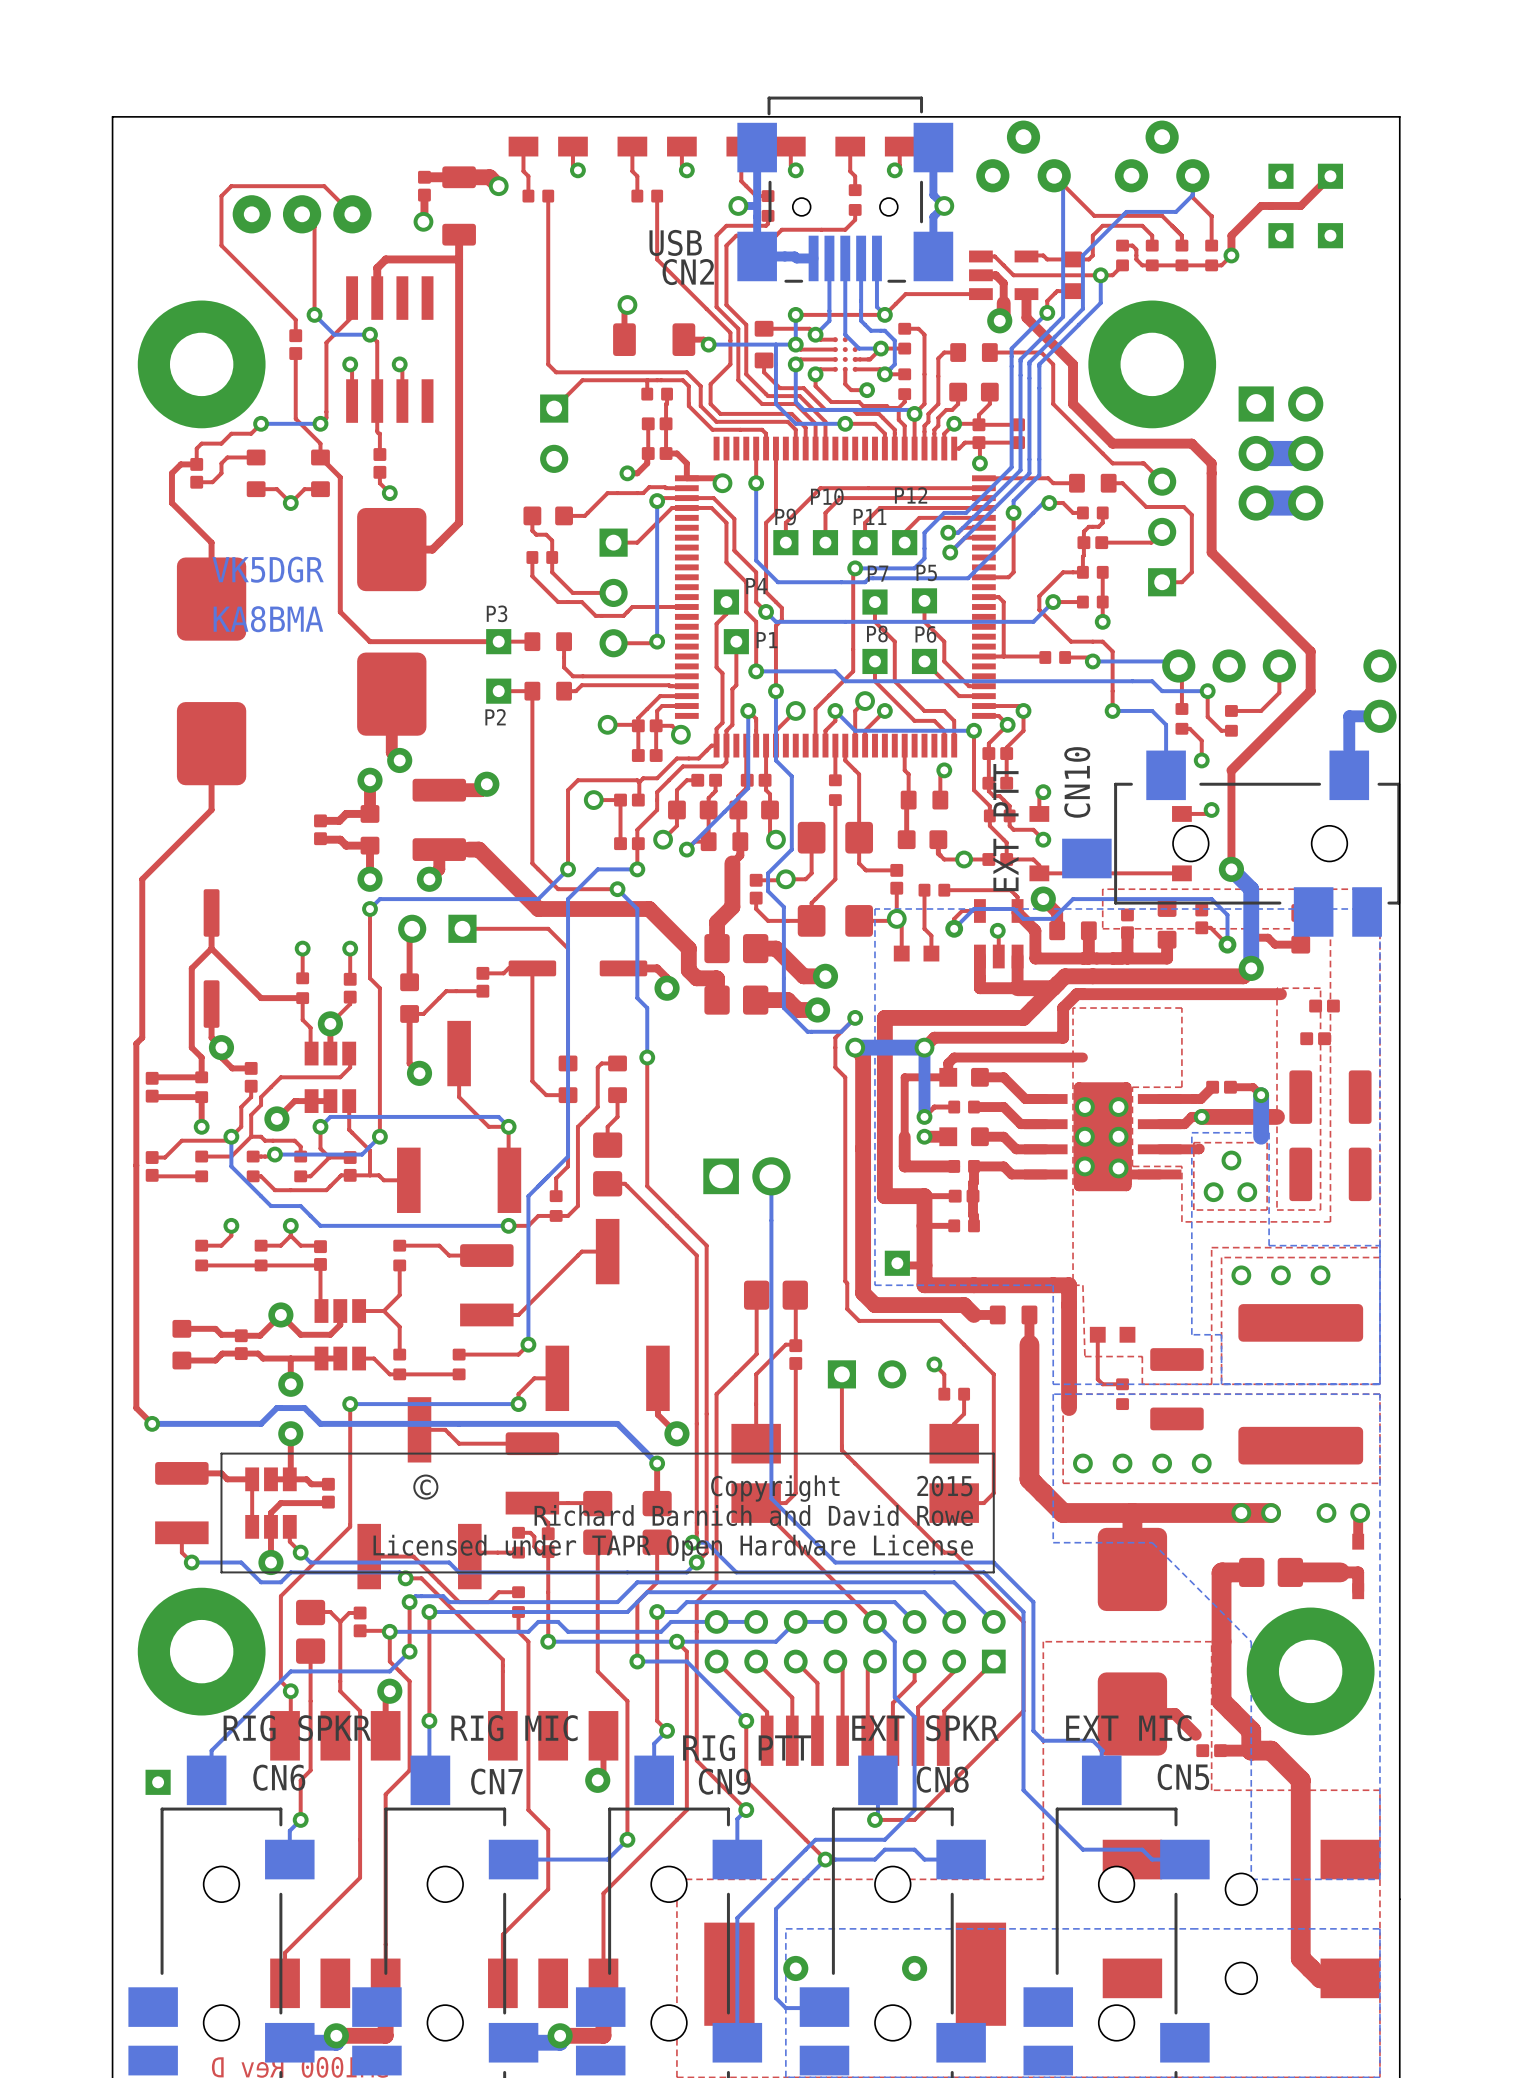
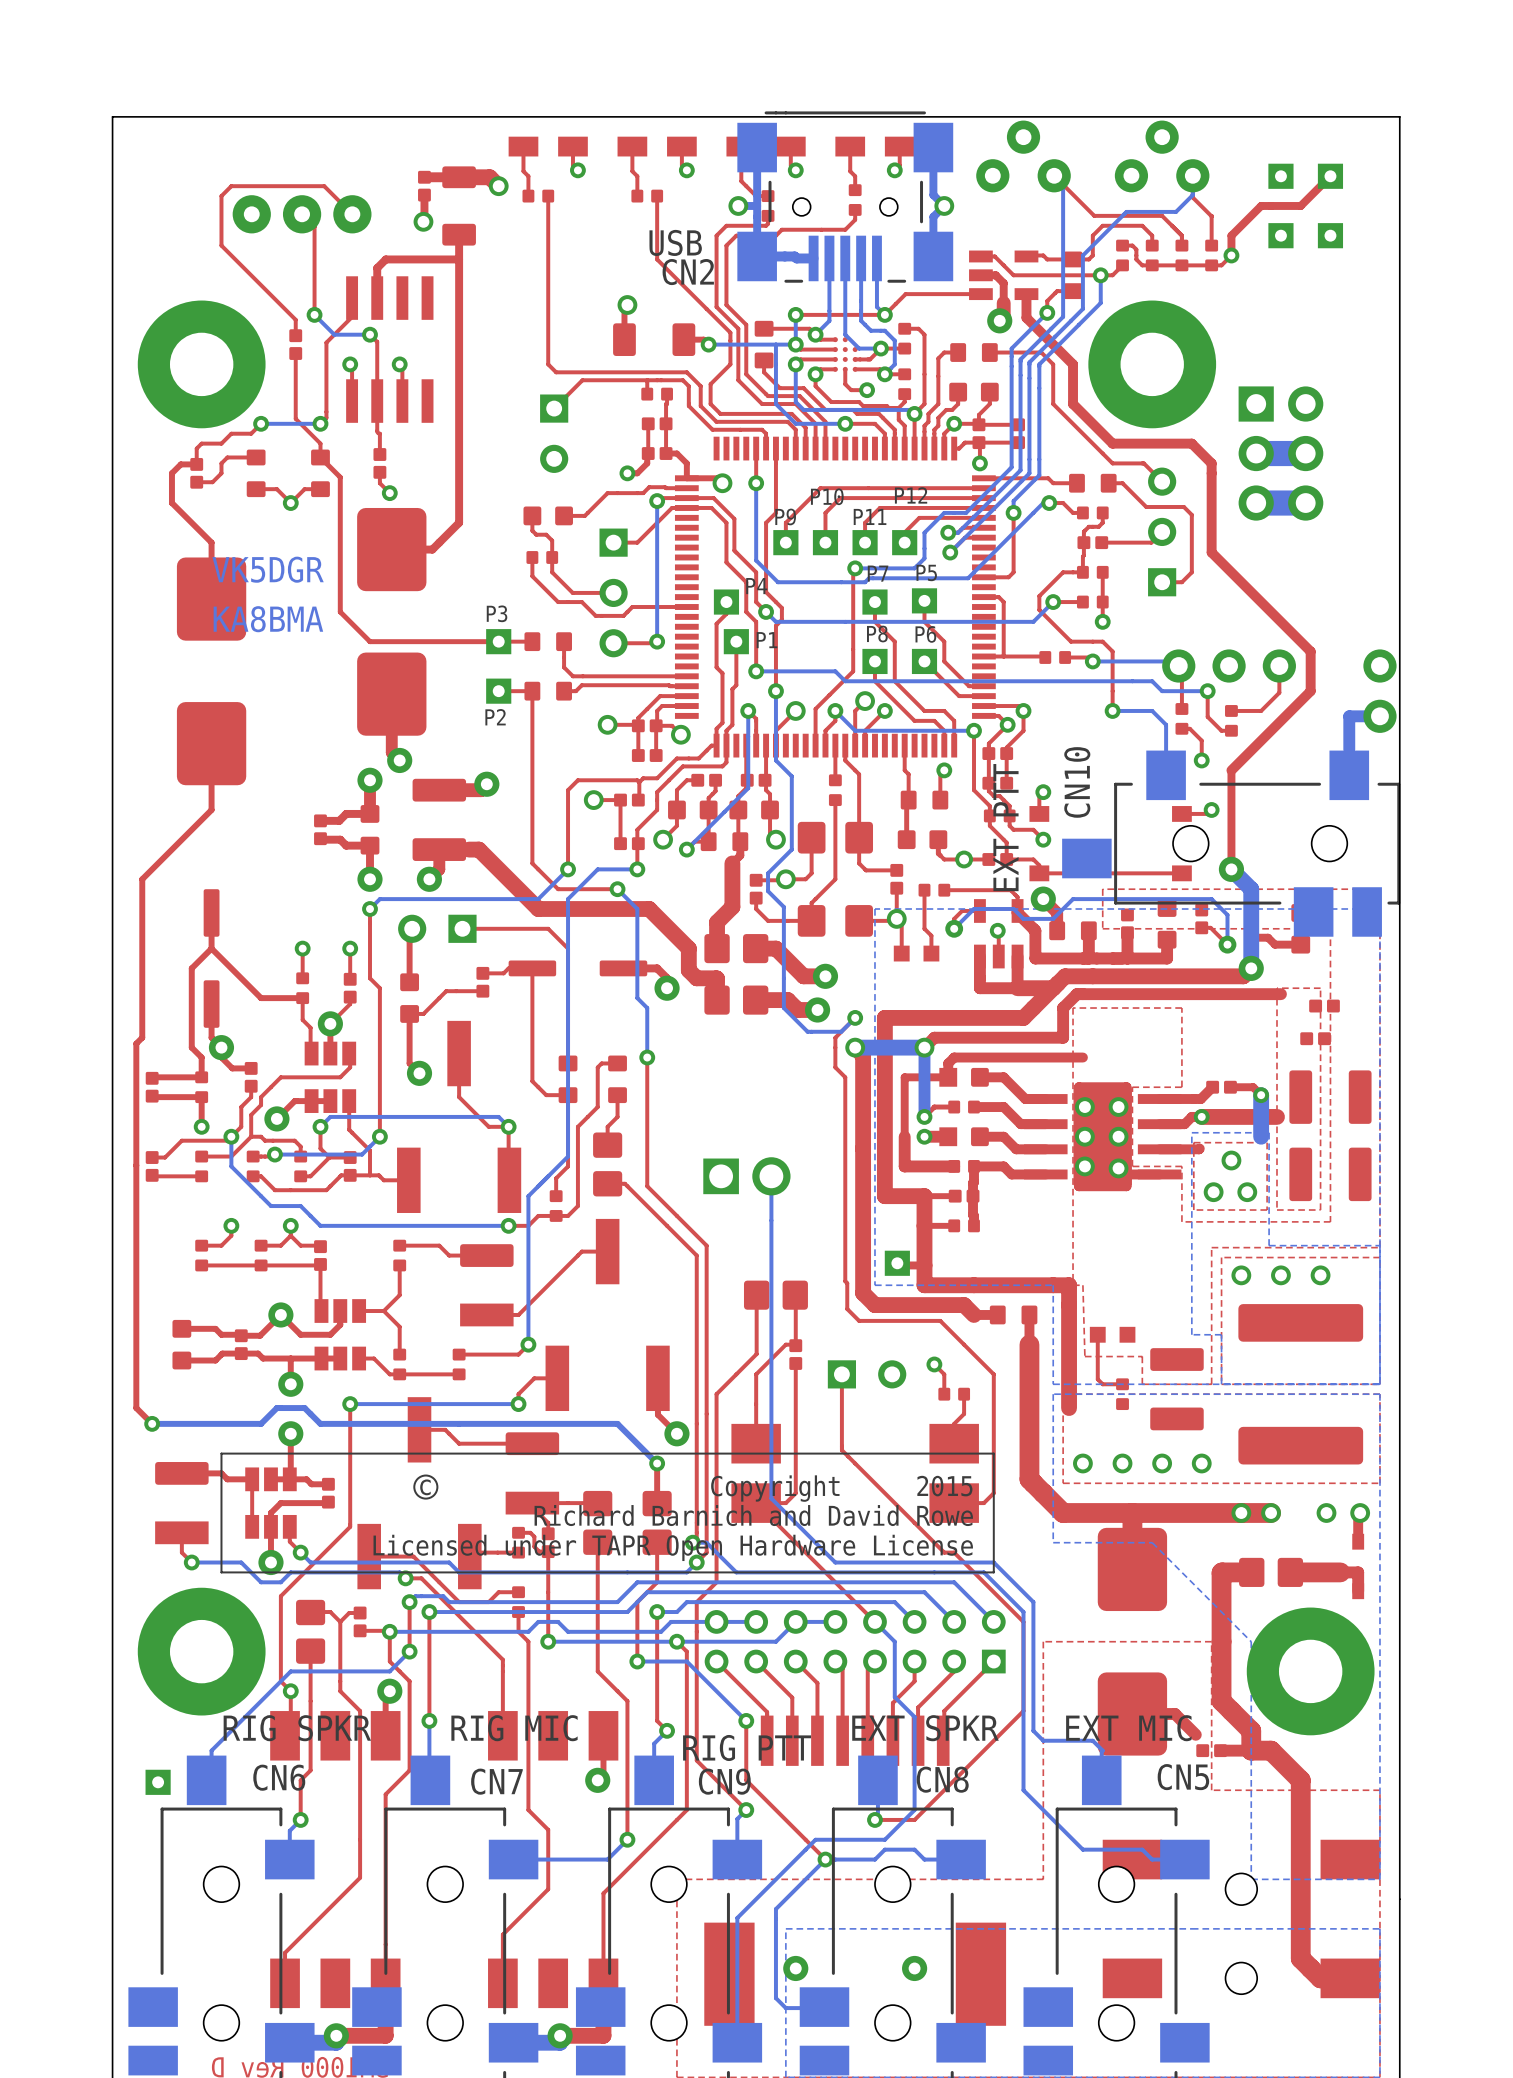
CN2 footprint: [737, 96, 954, 283] -> [737, 111, 954, 283]

